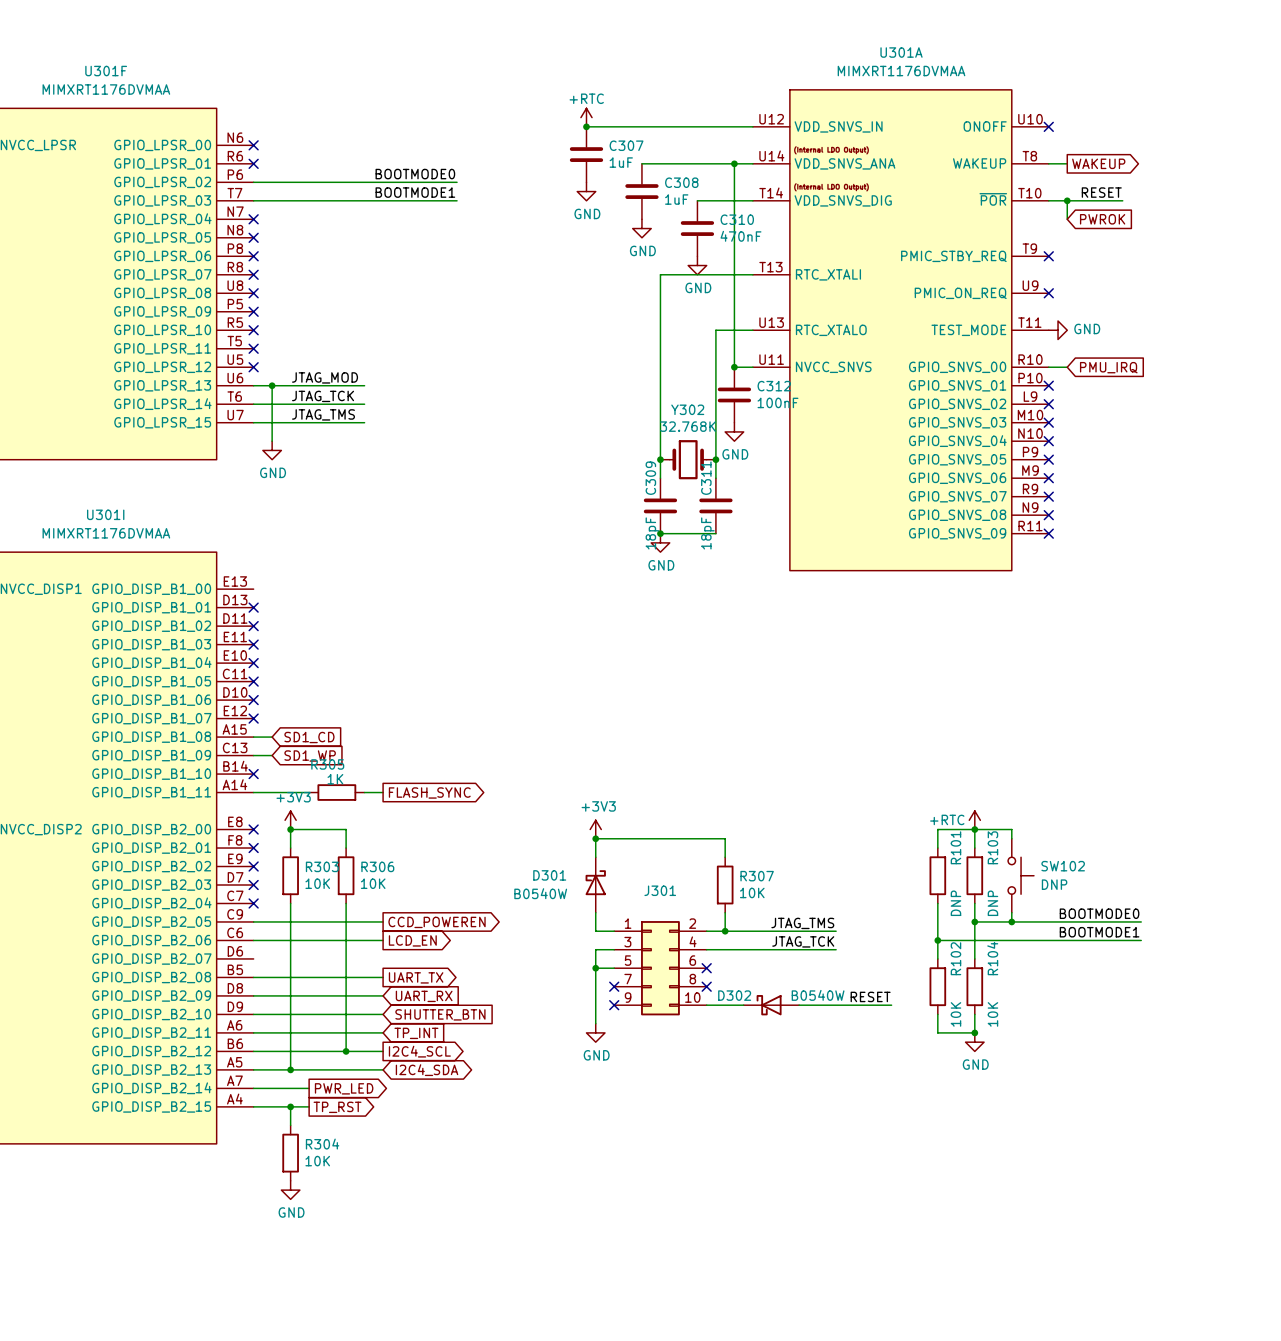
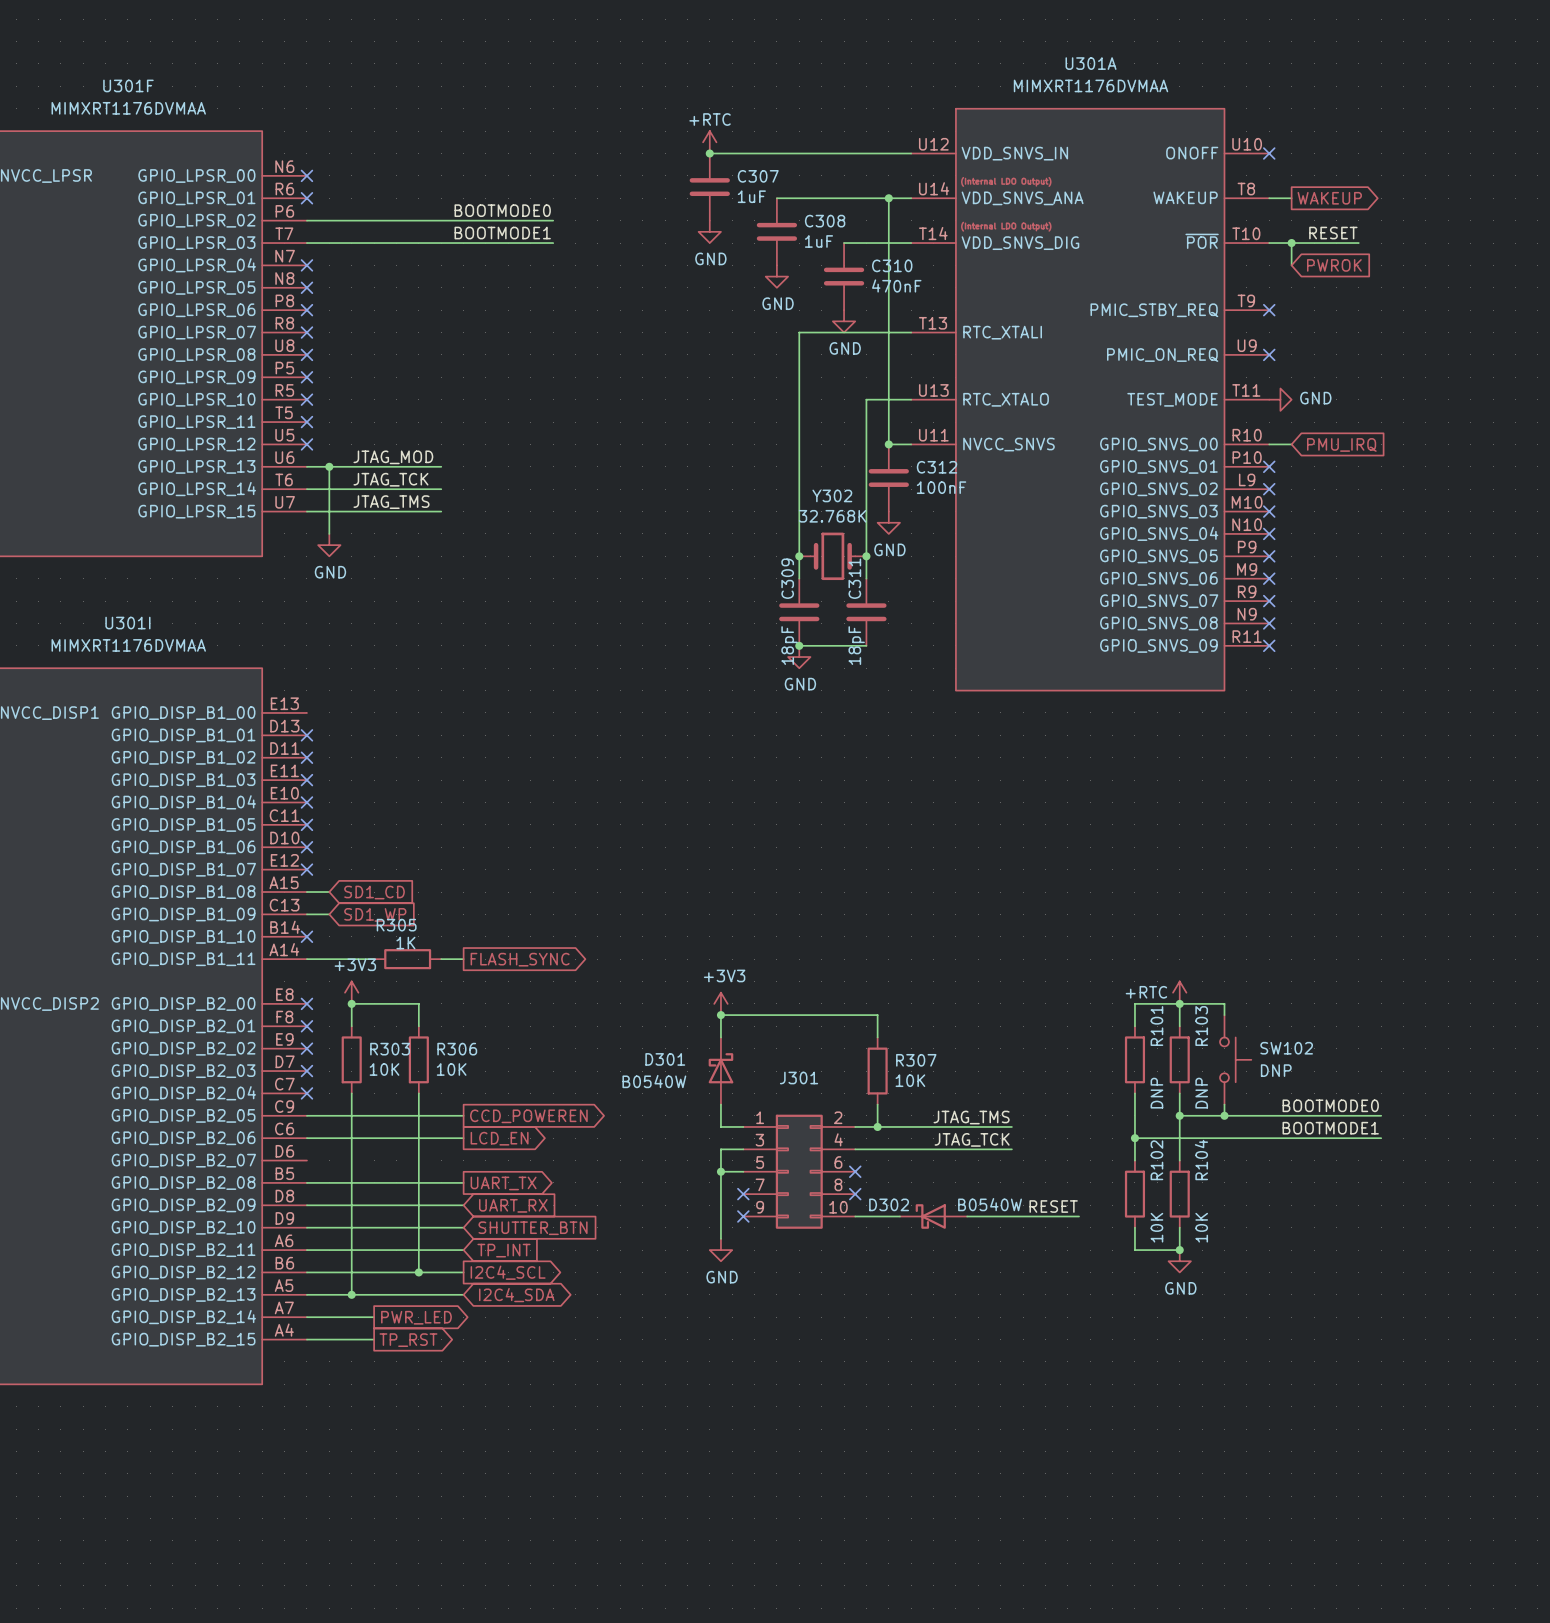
wire: (290, 1106) (290, 1125) -> none
junction: (290, 1106) -> none
R304: 10K (290, 1153) -> none
power symbol: GND (290, 1190) -> none

